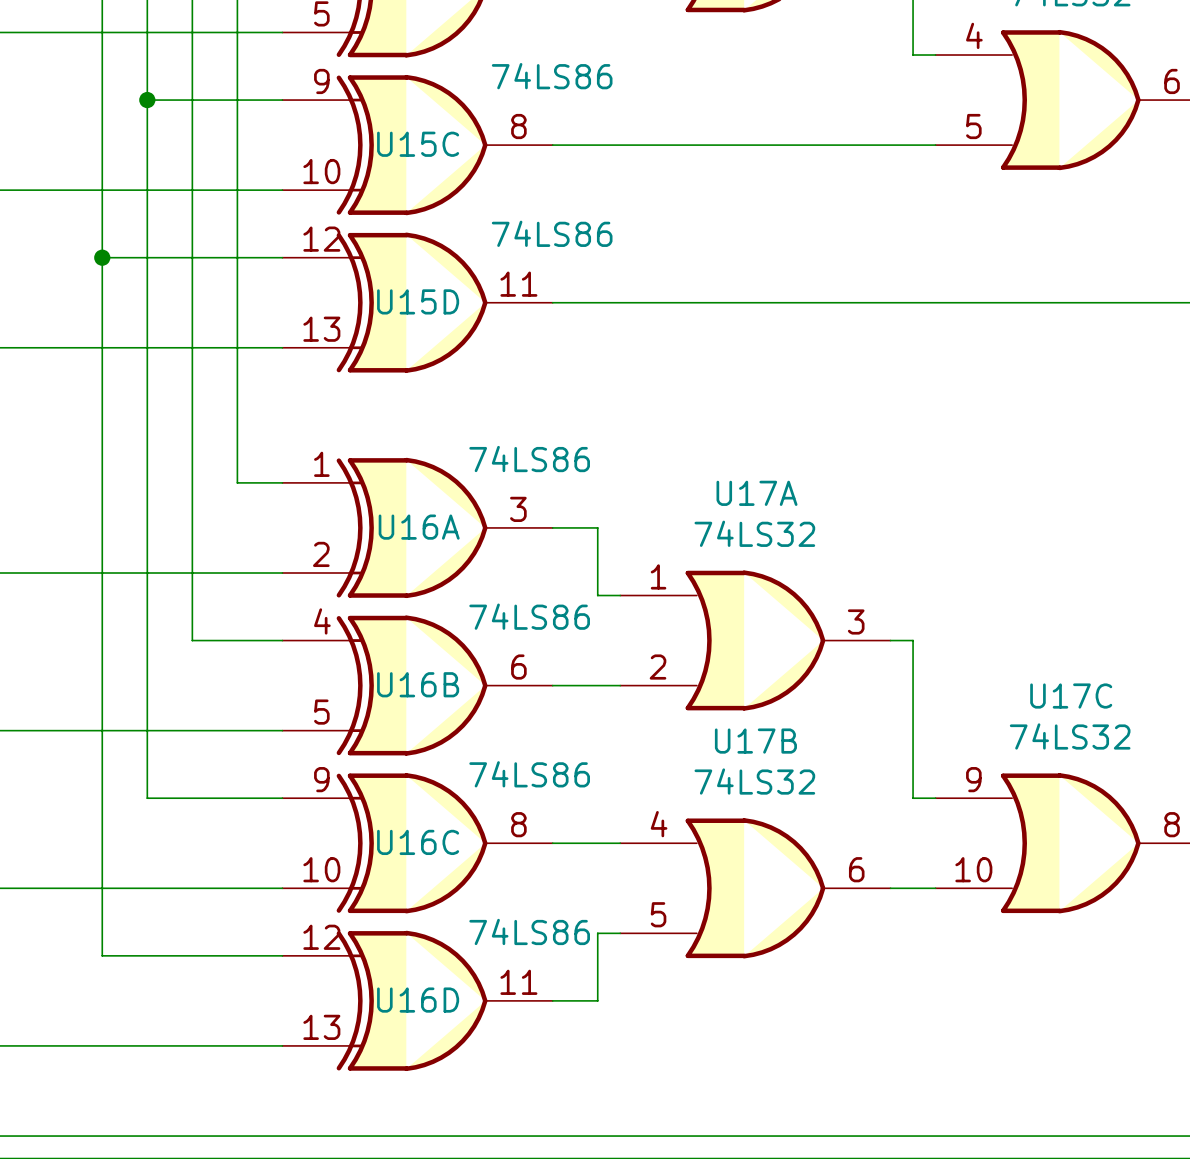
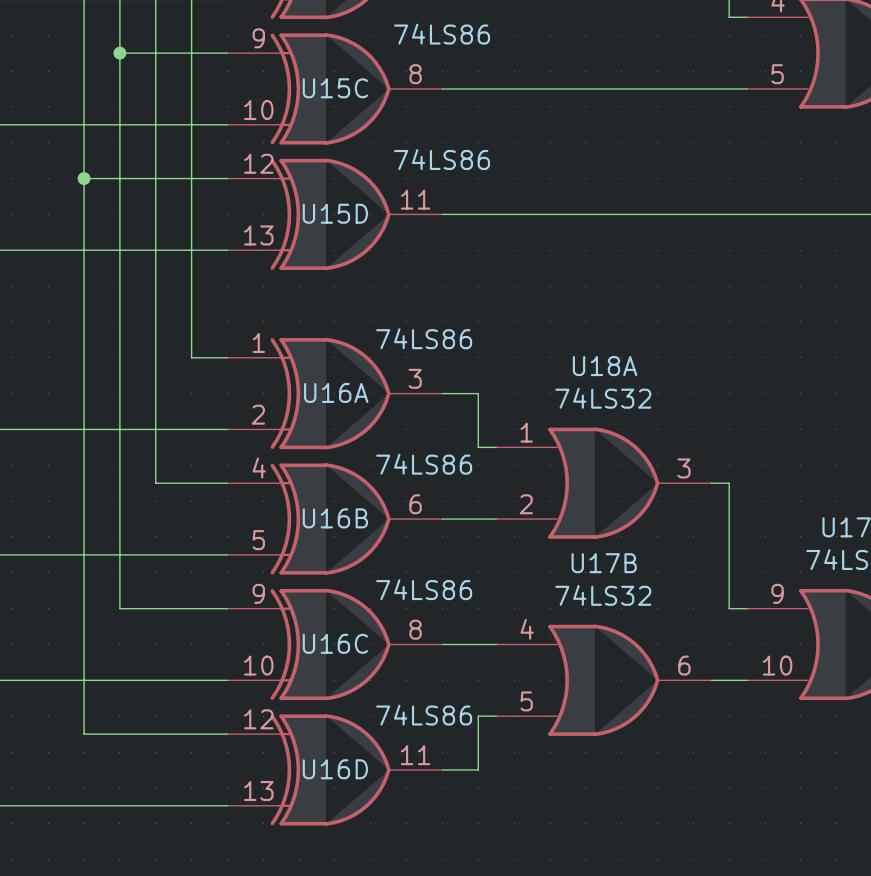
U17A name: U17A (757, 493) -> U18A (605, 366)

